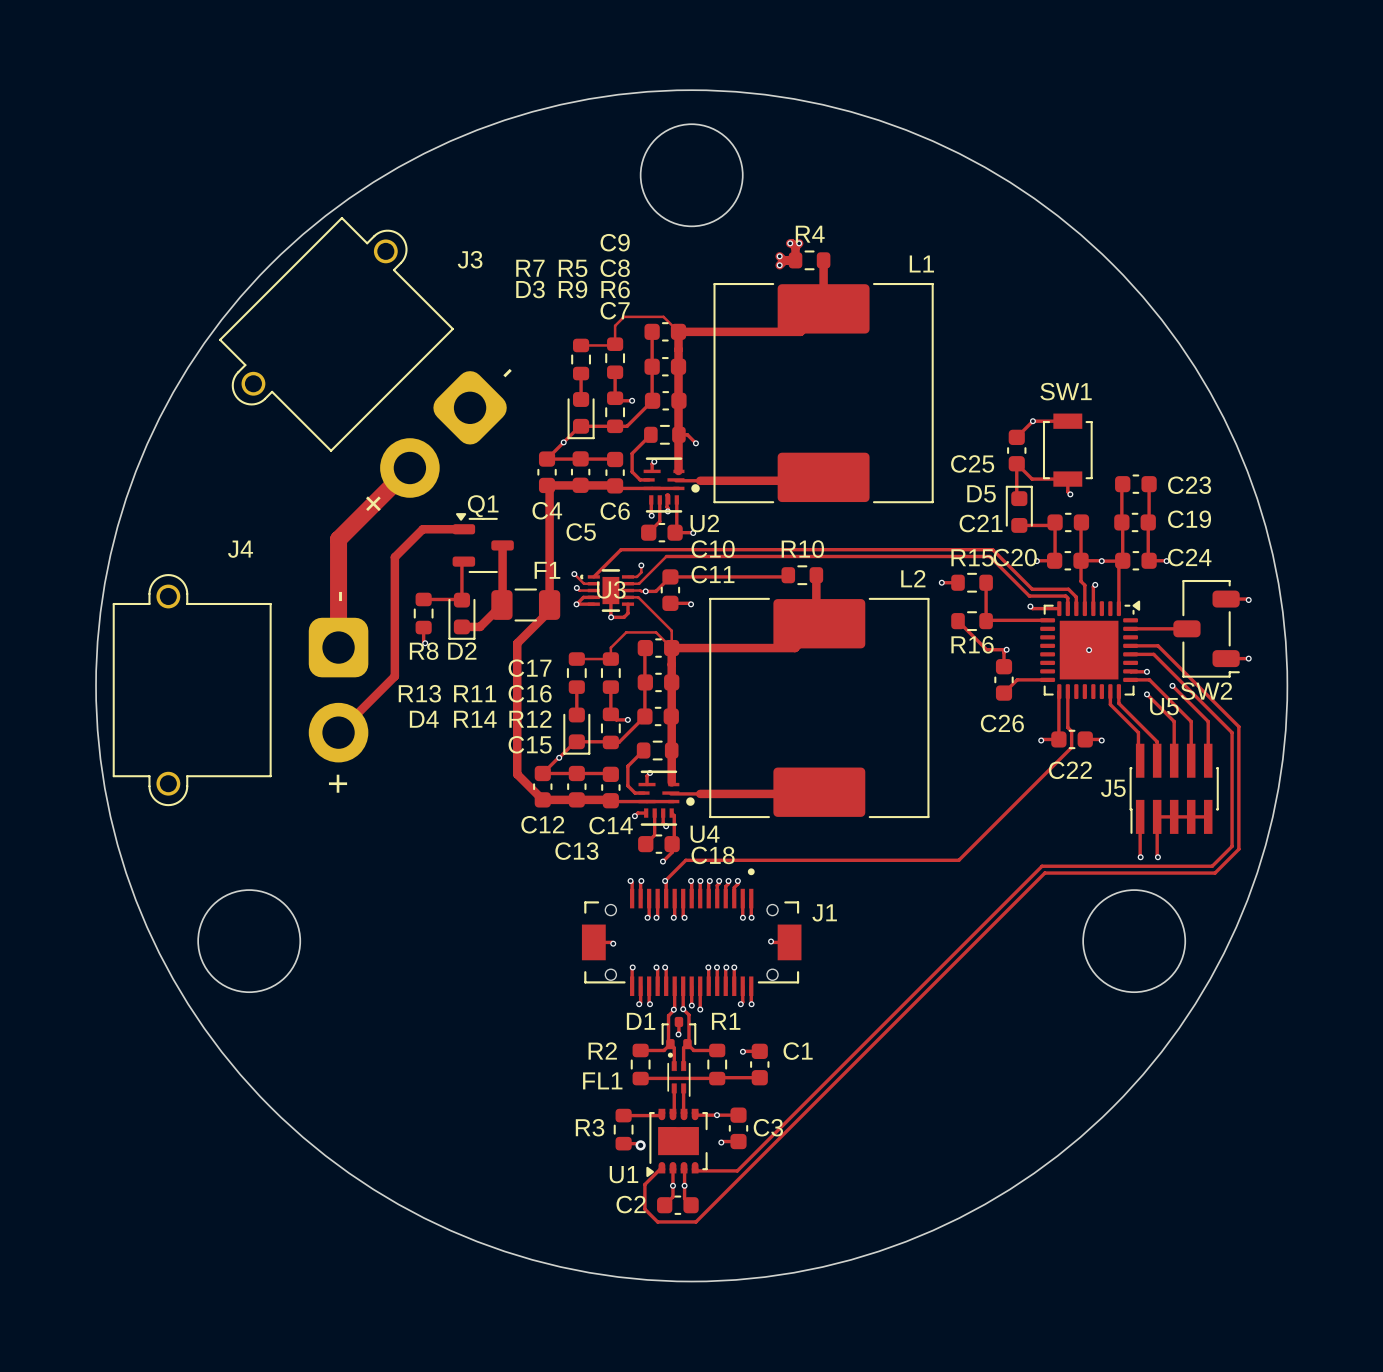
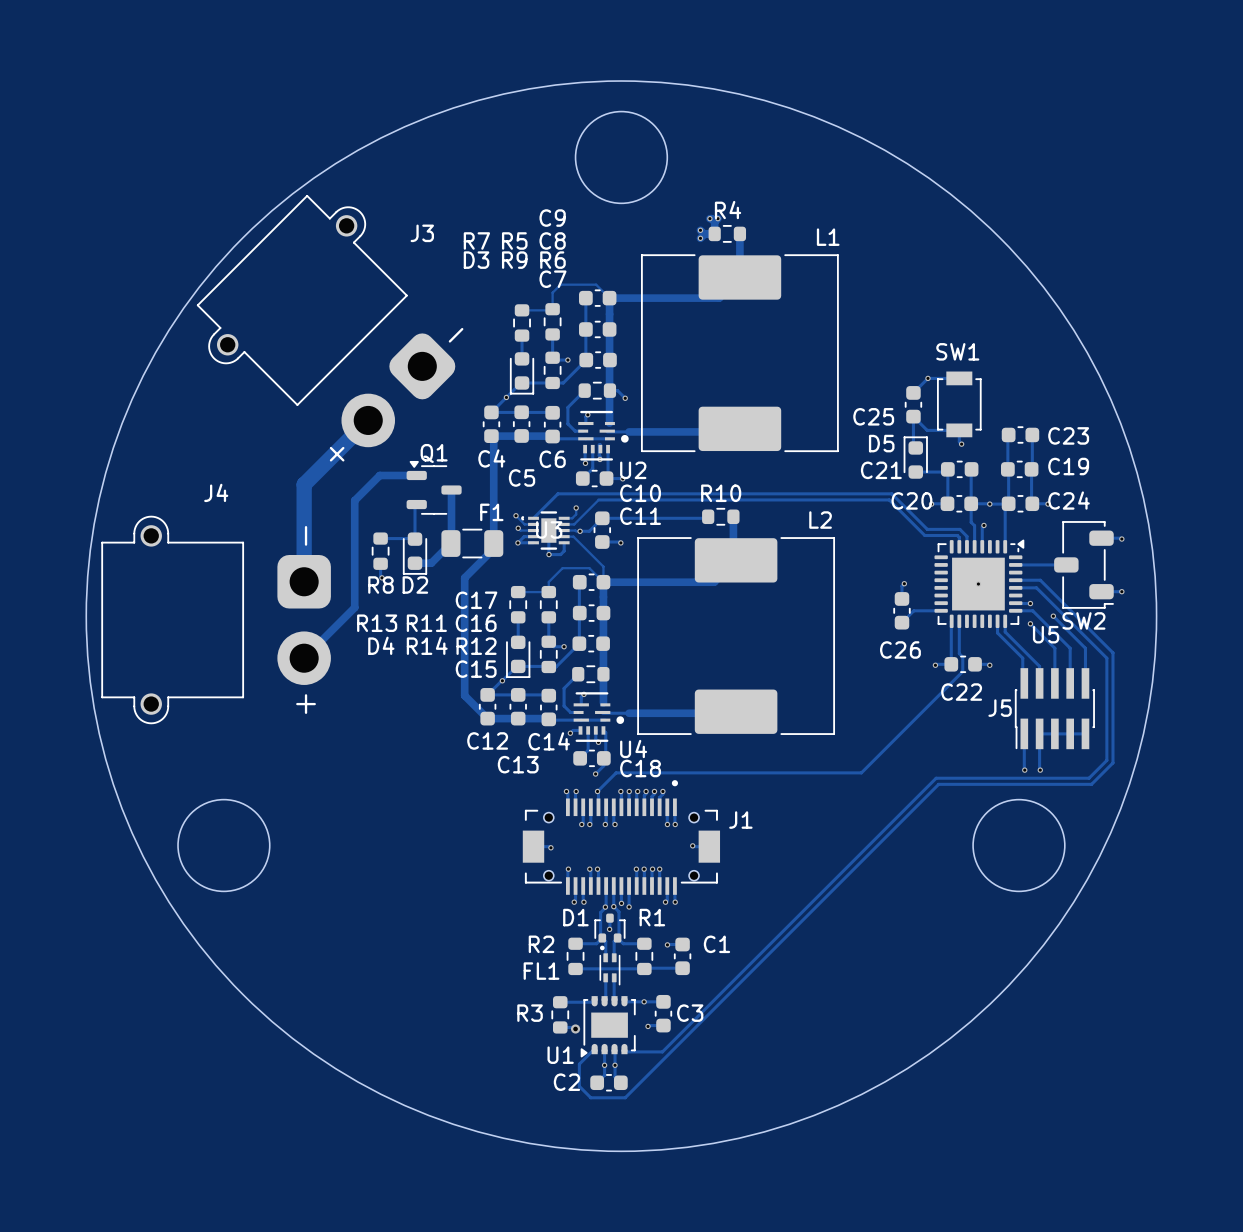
track: (941, 582) (958, 582) -> none
via: (941, 582) -> none
R15: (972, 582) -> none
track: (986, 582) (986, 621) (1047, 620) -> none
track: (1030, 606) (1032, 608) (1059, 608) -> none
via: (1030, 606) -> none
track: (958, 621) (986, 649) (1006, 649) -> none
R16: (972, 621) -> none

